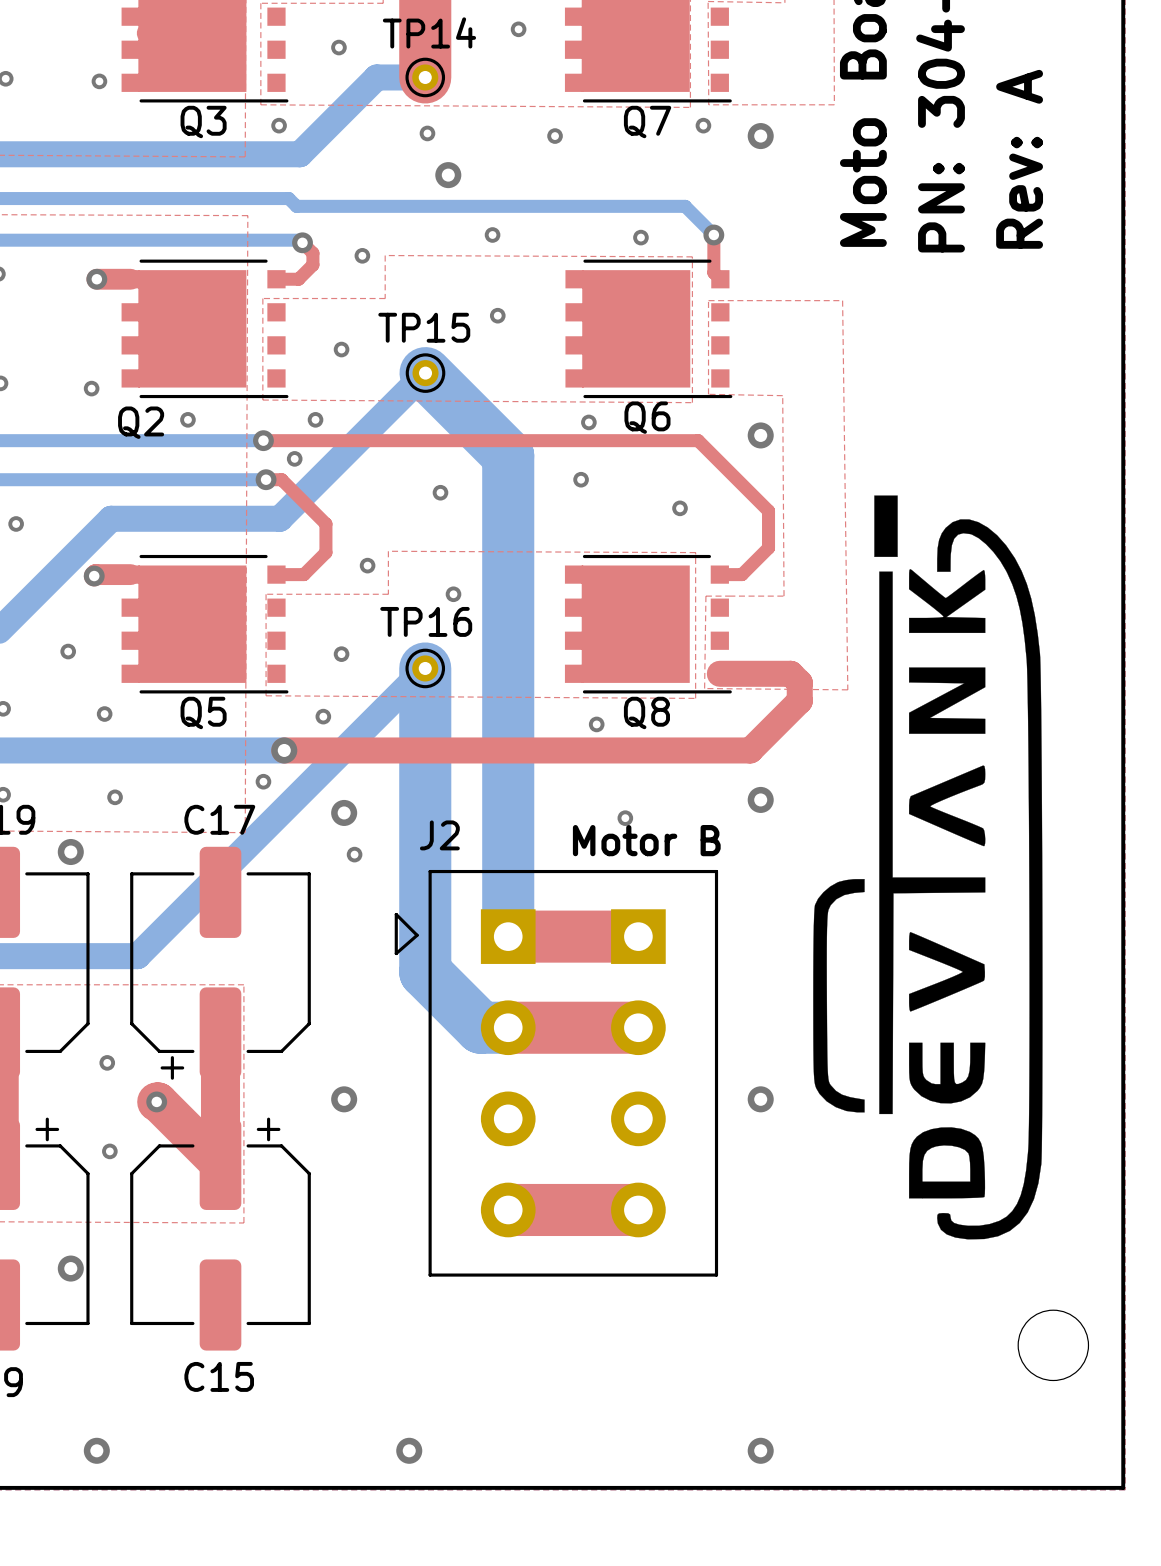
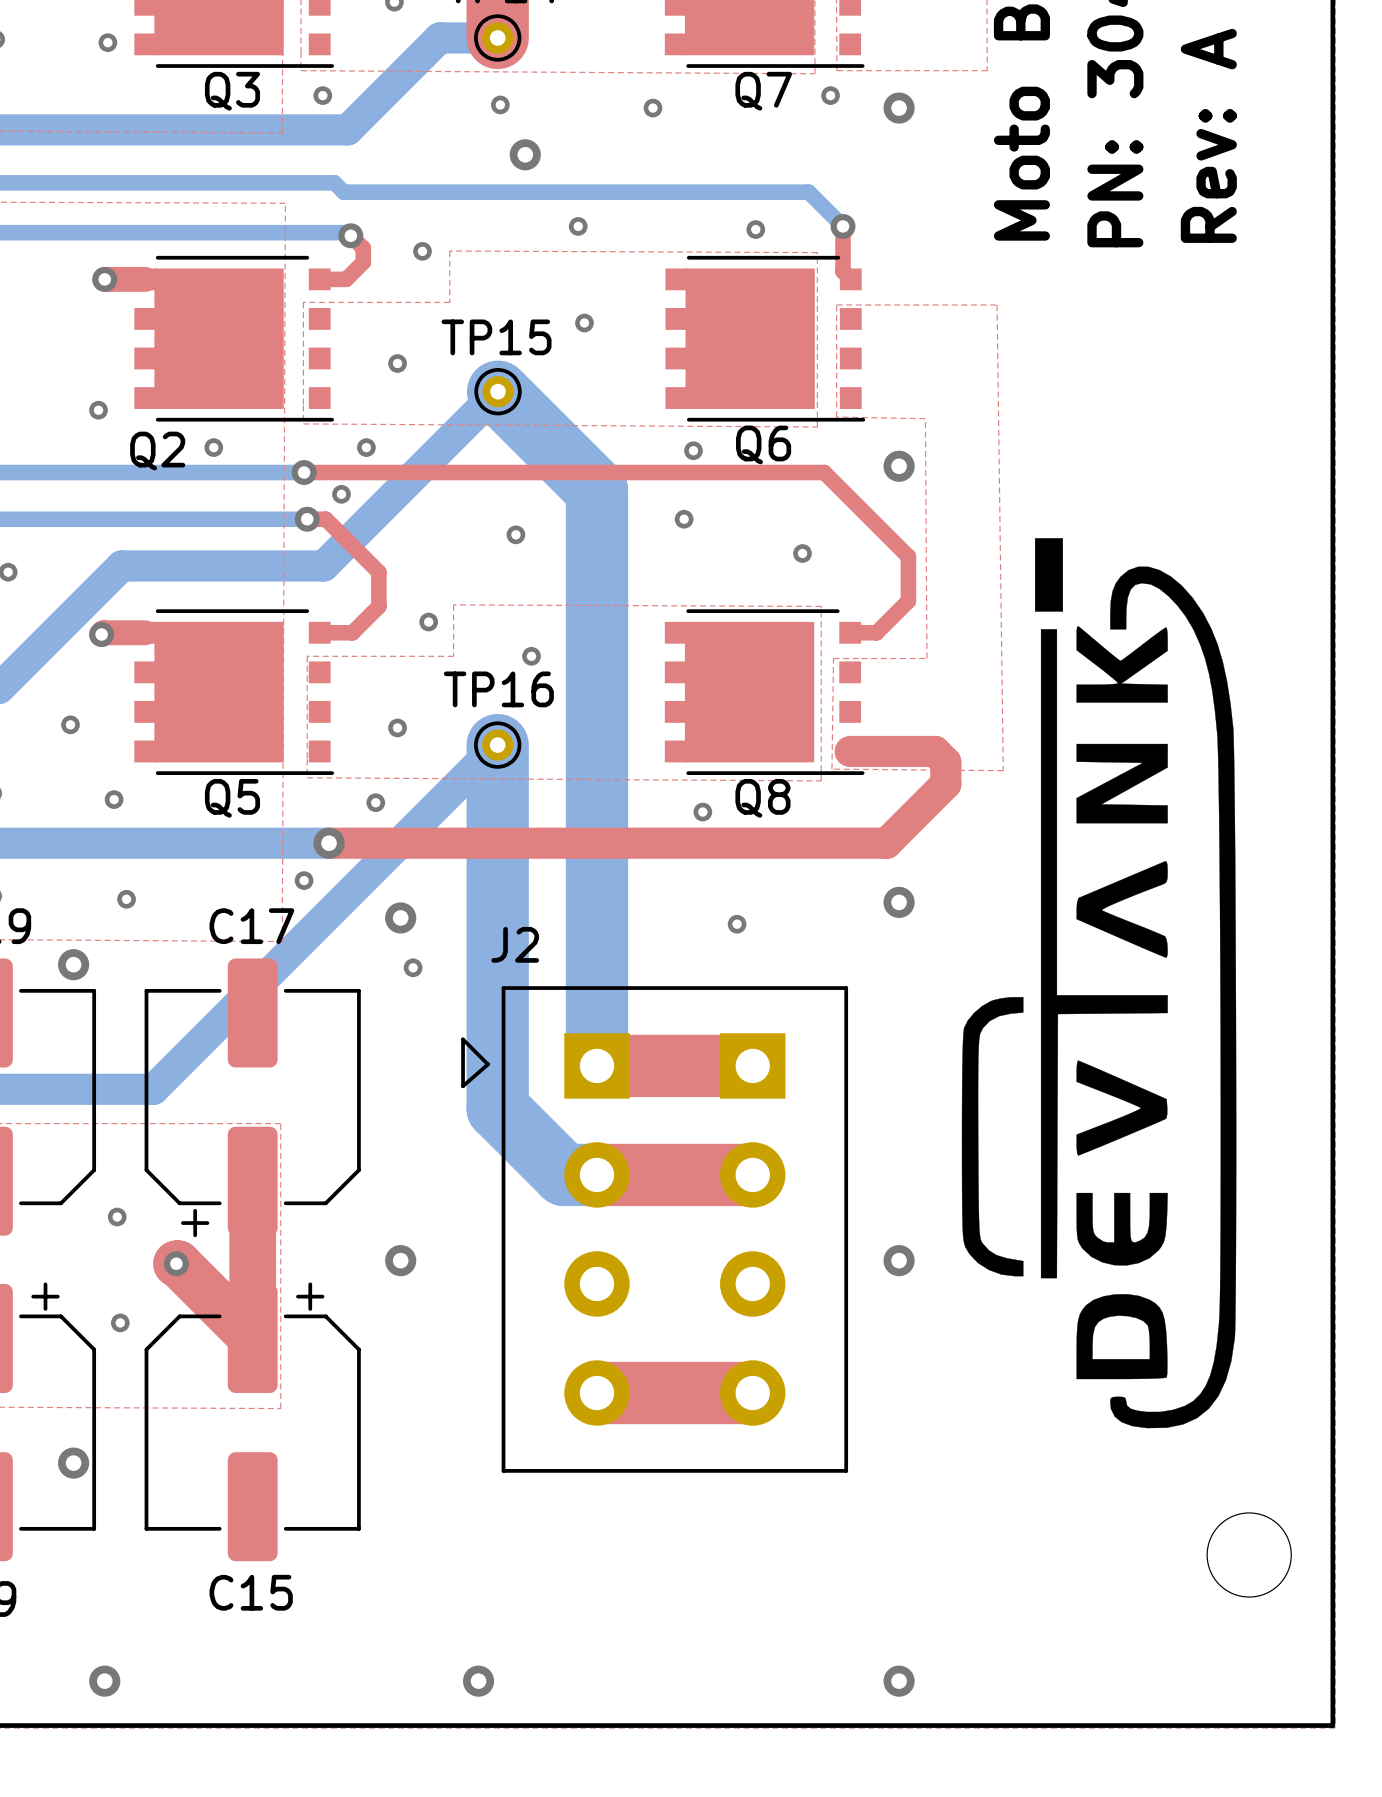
text: Motor B (646, 840) -> none

